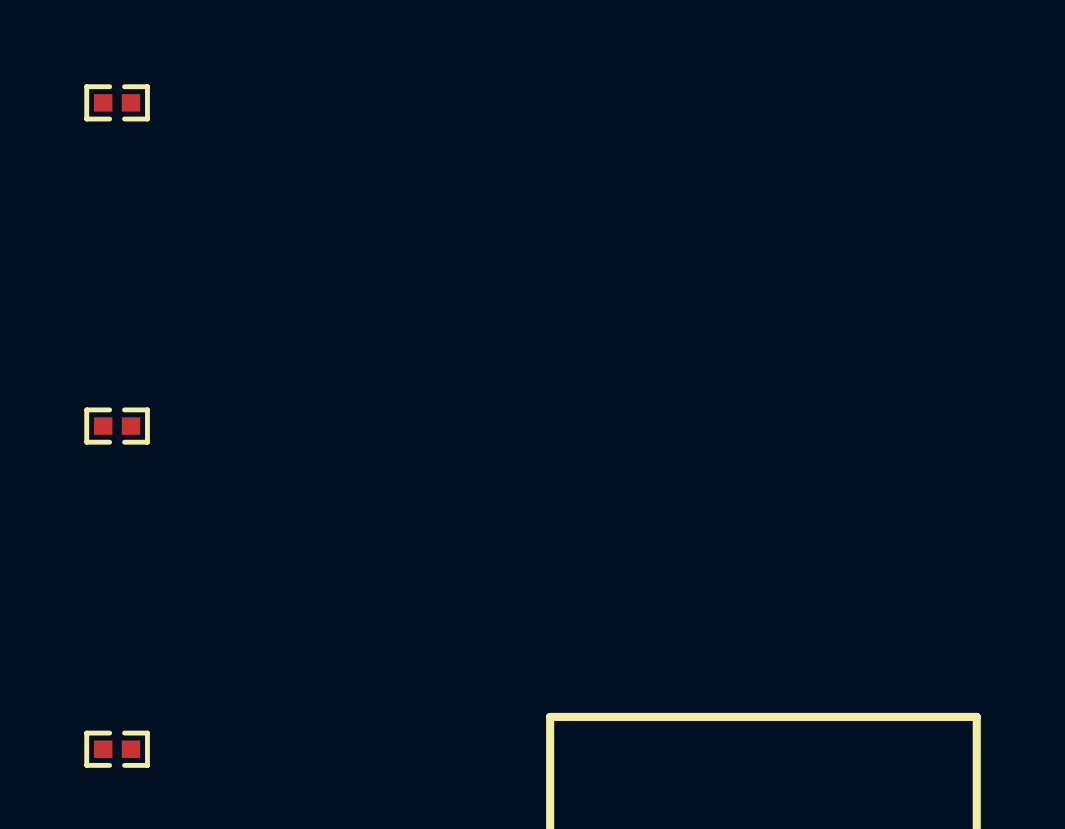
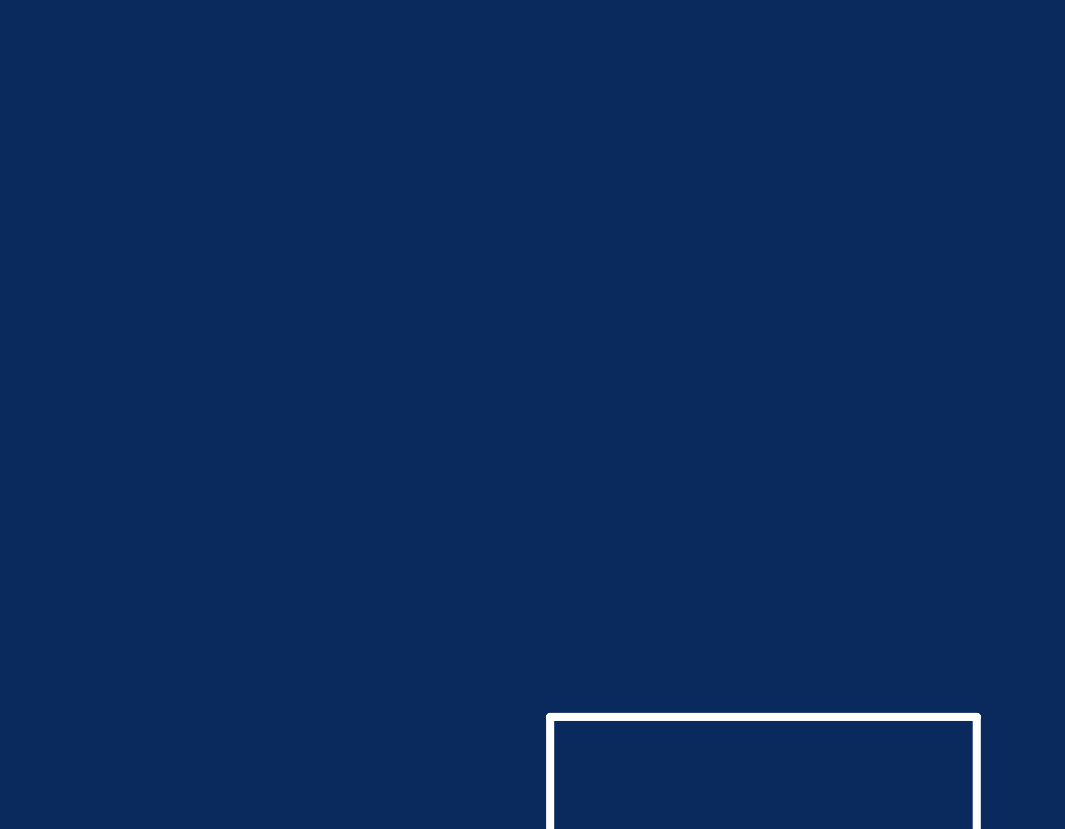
part: (117, 102) -> none
part: (117, 426) -> none
part: (117, 749) -> none

